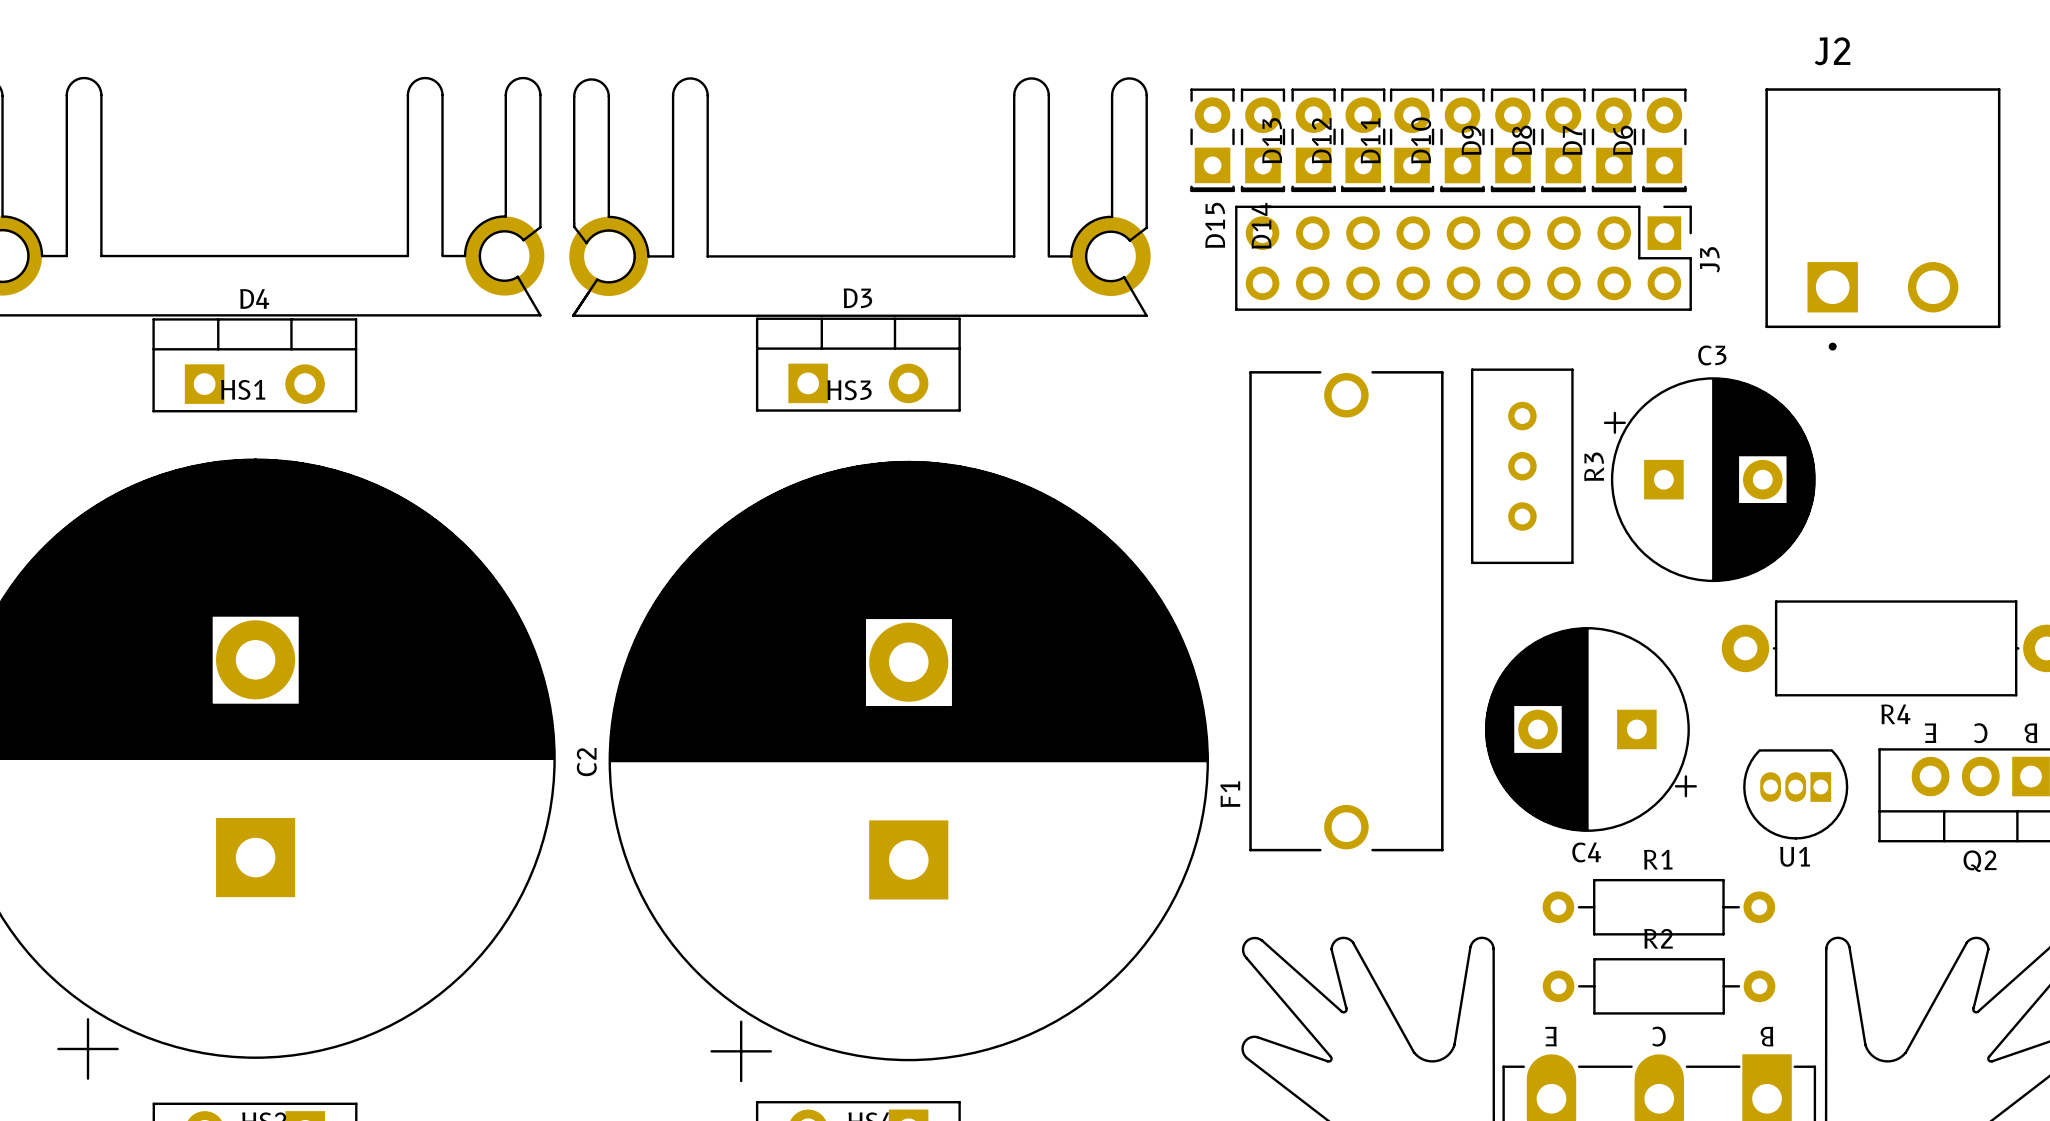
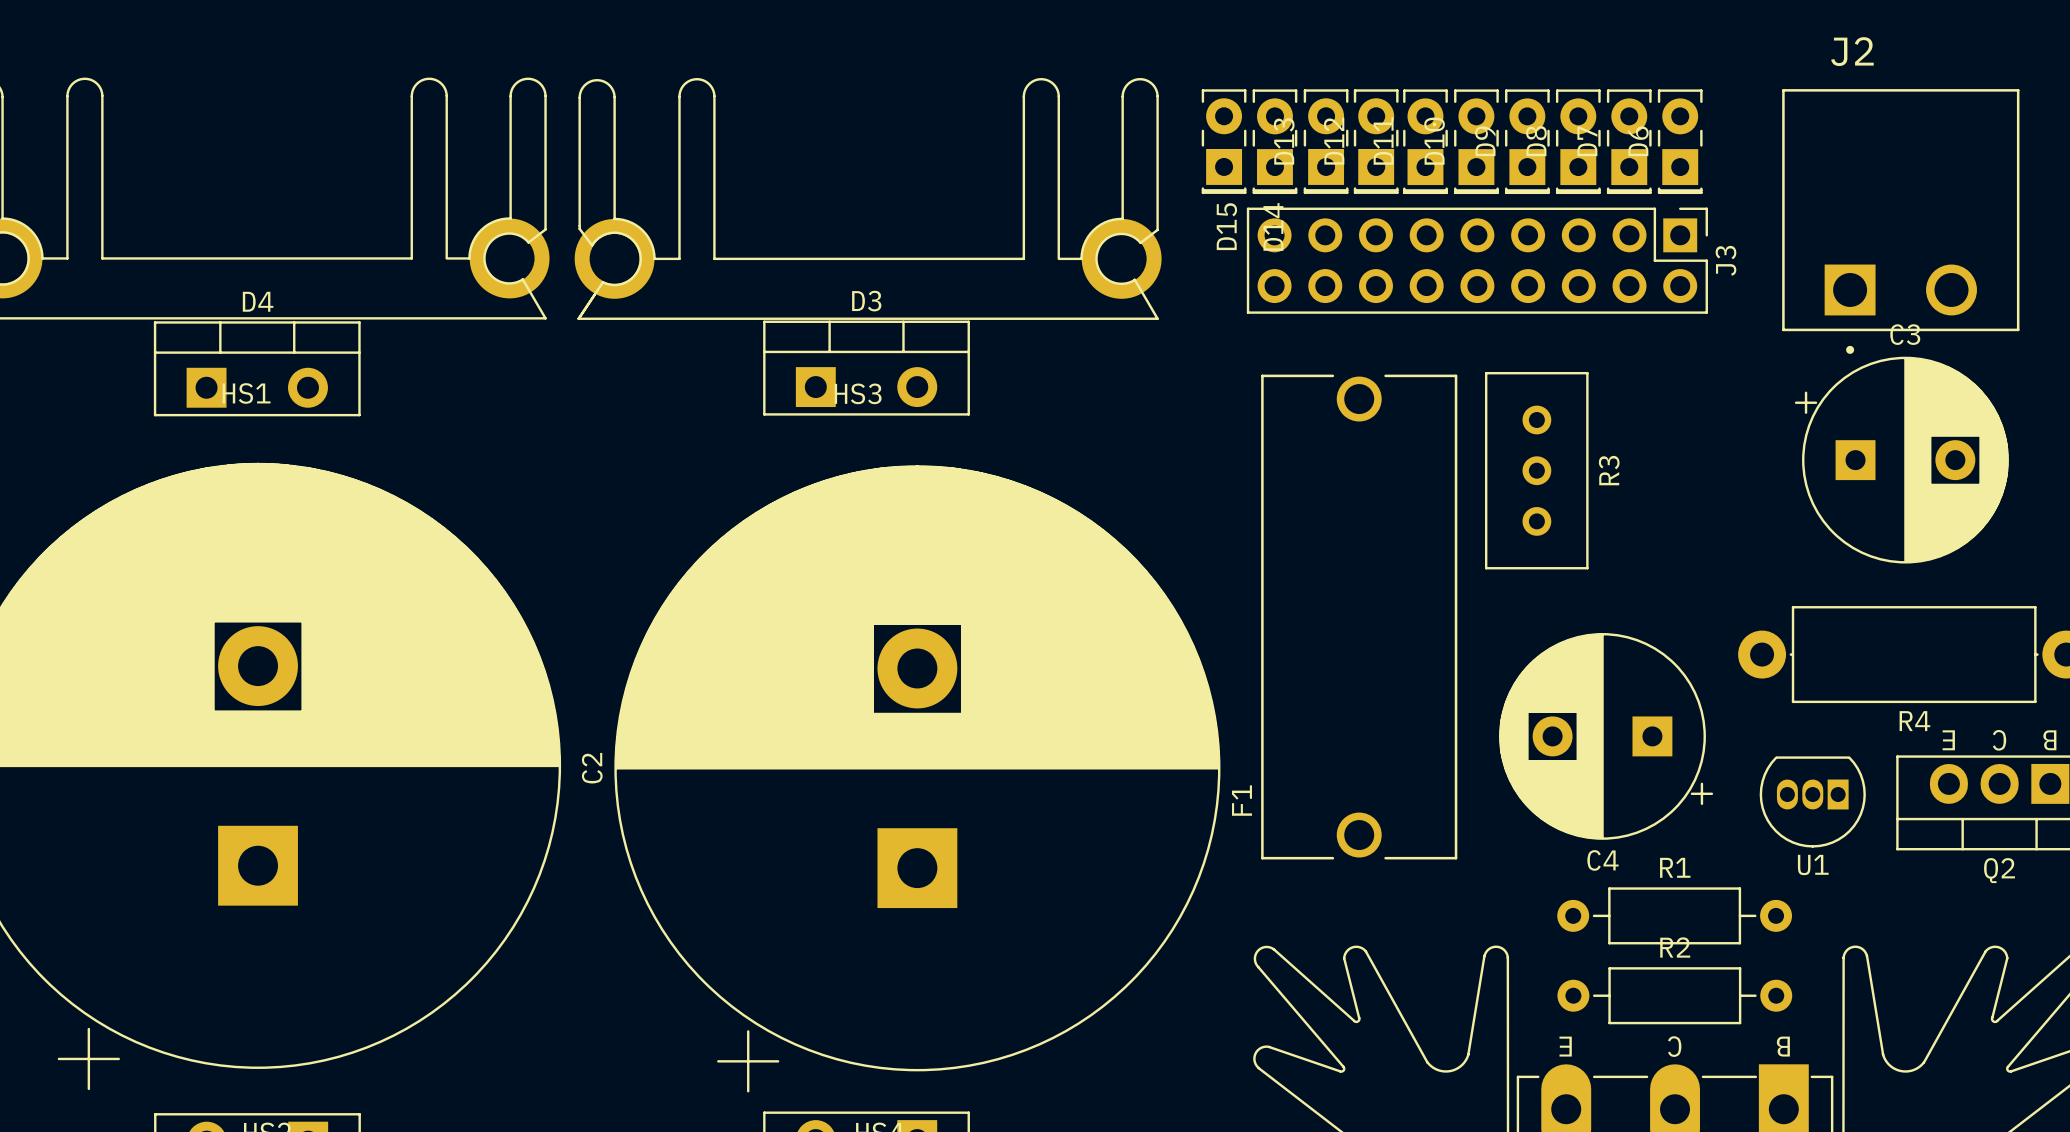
C3 position: (1709, 479) -> (1901, 460)

